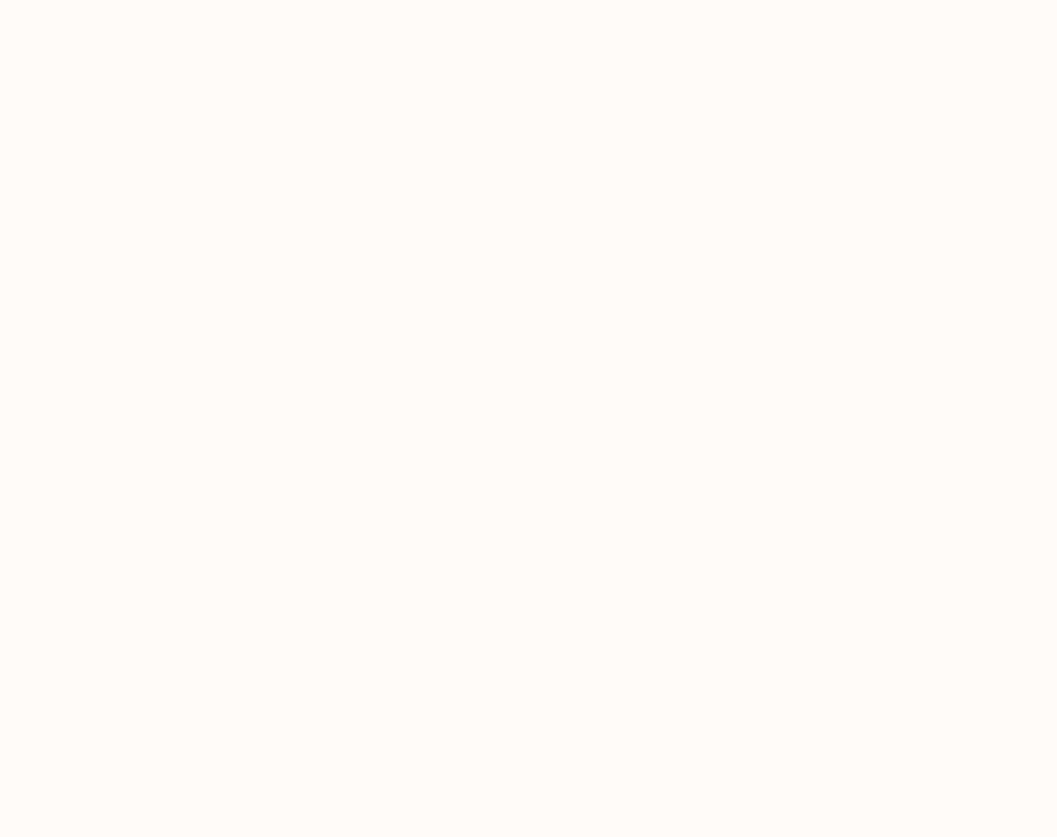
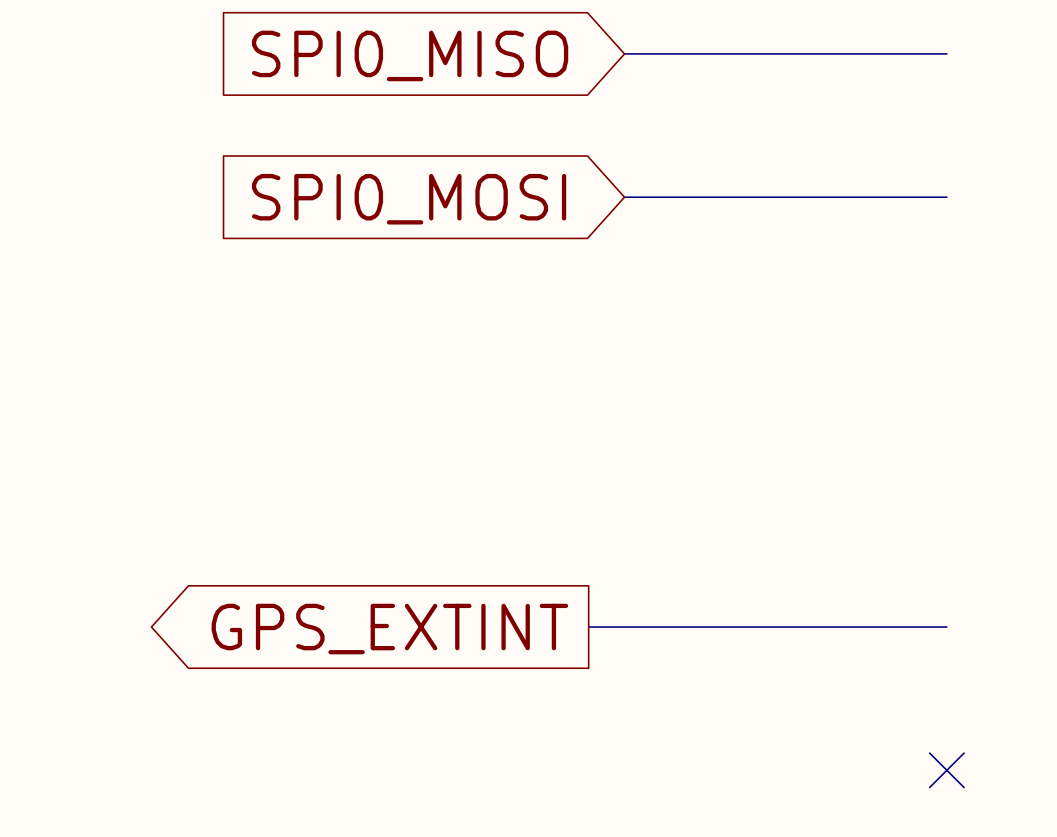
wire: none -> (624, 53) (946, 53)
global label: none -> SPI0_MISO (410, 55)
wire: none -> (624, 197) (946, 197)
global label: none -> SPI0_MOSI (409, 199)
wire: none -> (588, 627) (946, 627)
global label: none -> GPS_EXTINT (389, 629)
no-connect mark: none -> (946, 770)

